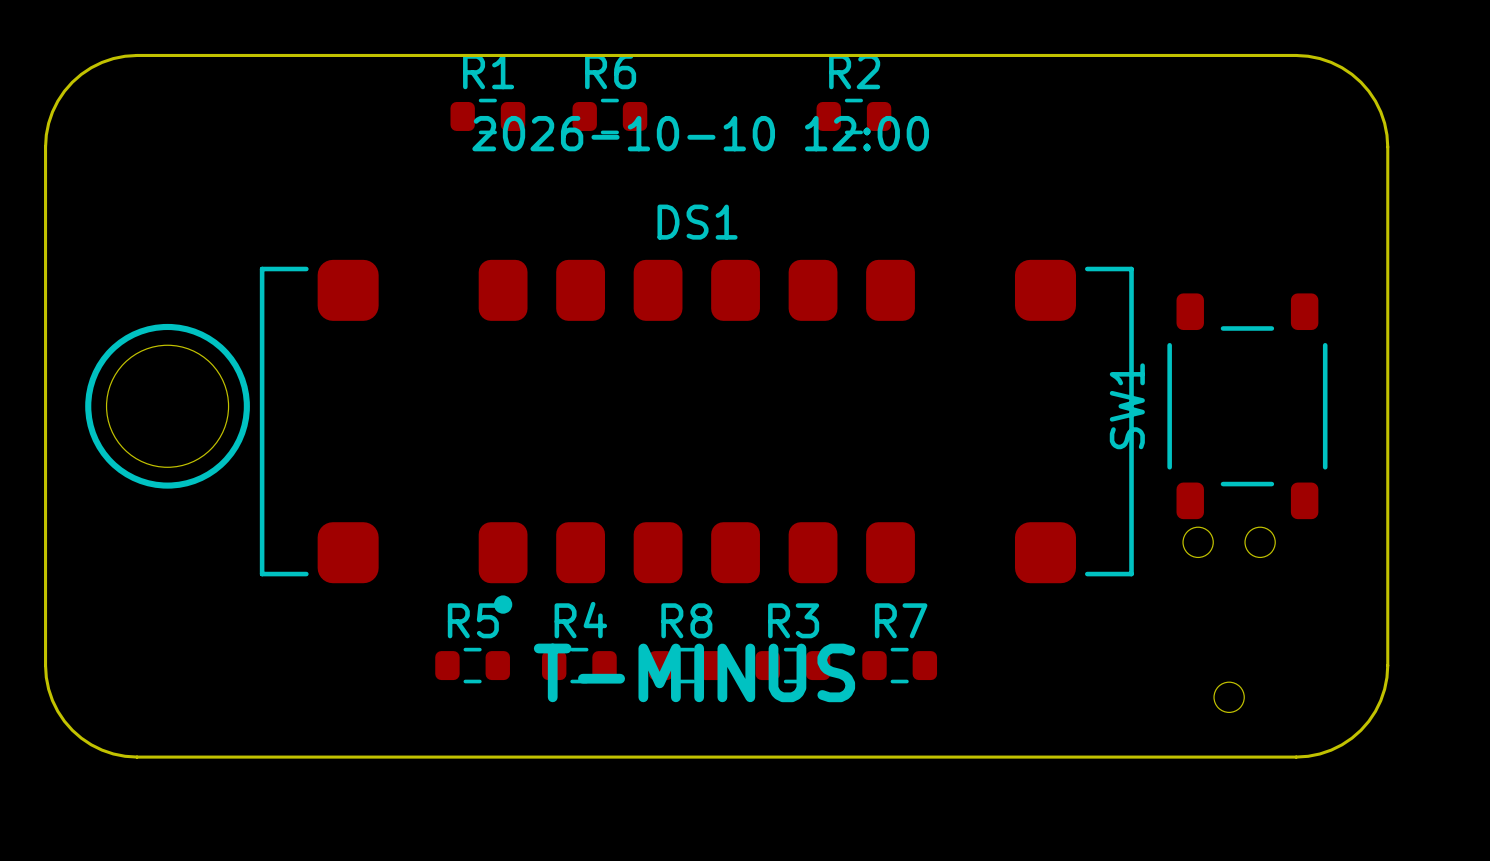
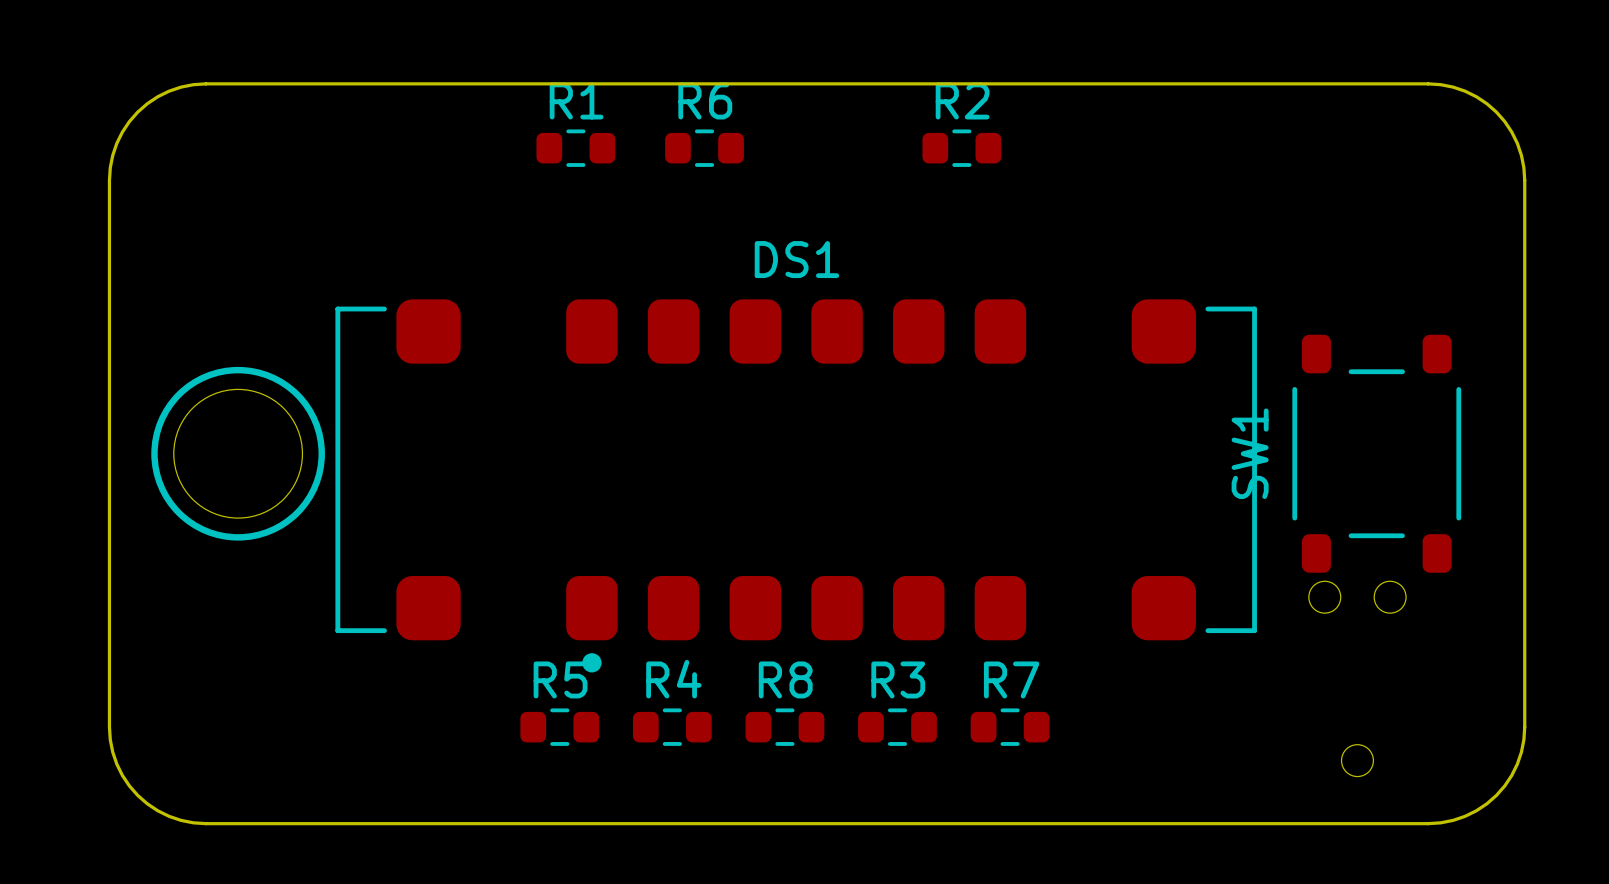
text: 2026-10-10 12:00 (700, 133) -> none
text: T-MINUS (694, 672) -> none

